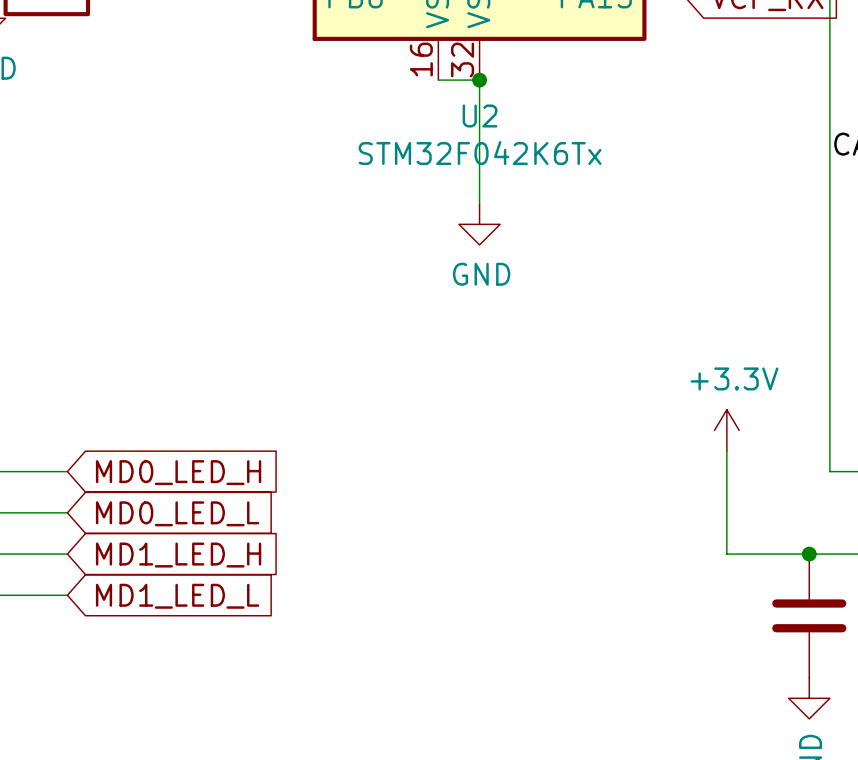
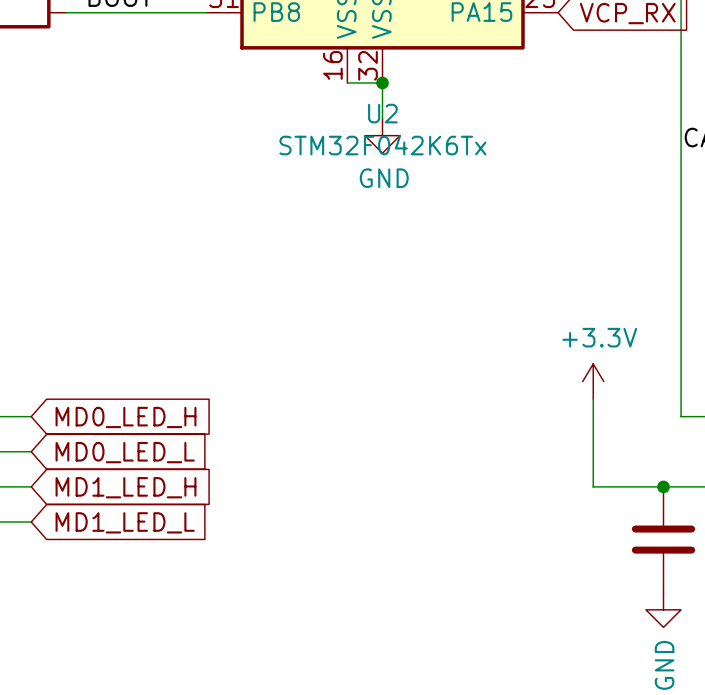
wire: (479, 121) (479, 203) -> none
power symbol position: GND (479, 224) -> GND (382, 135)

